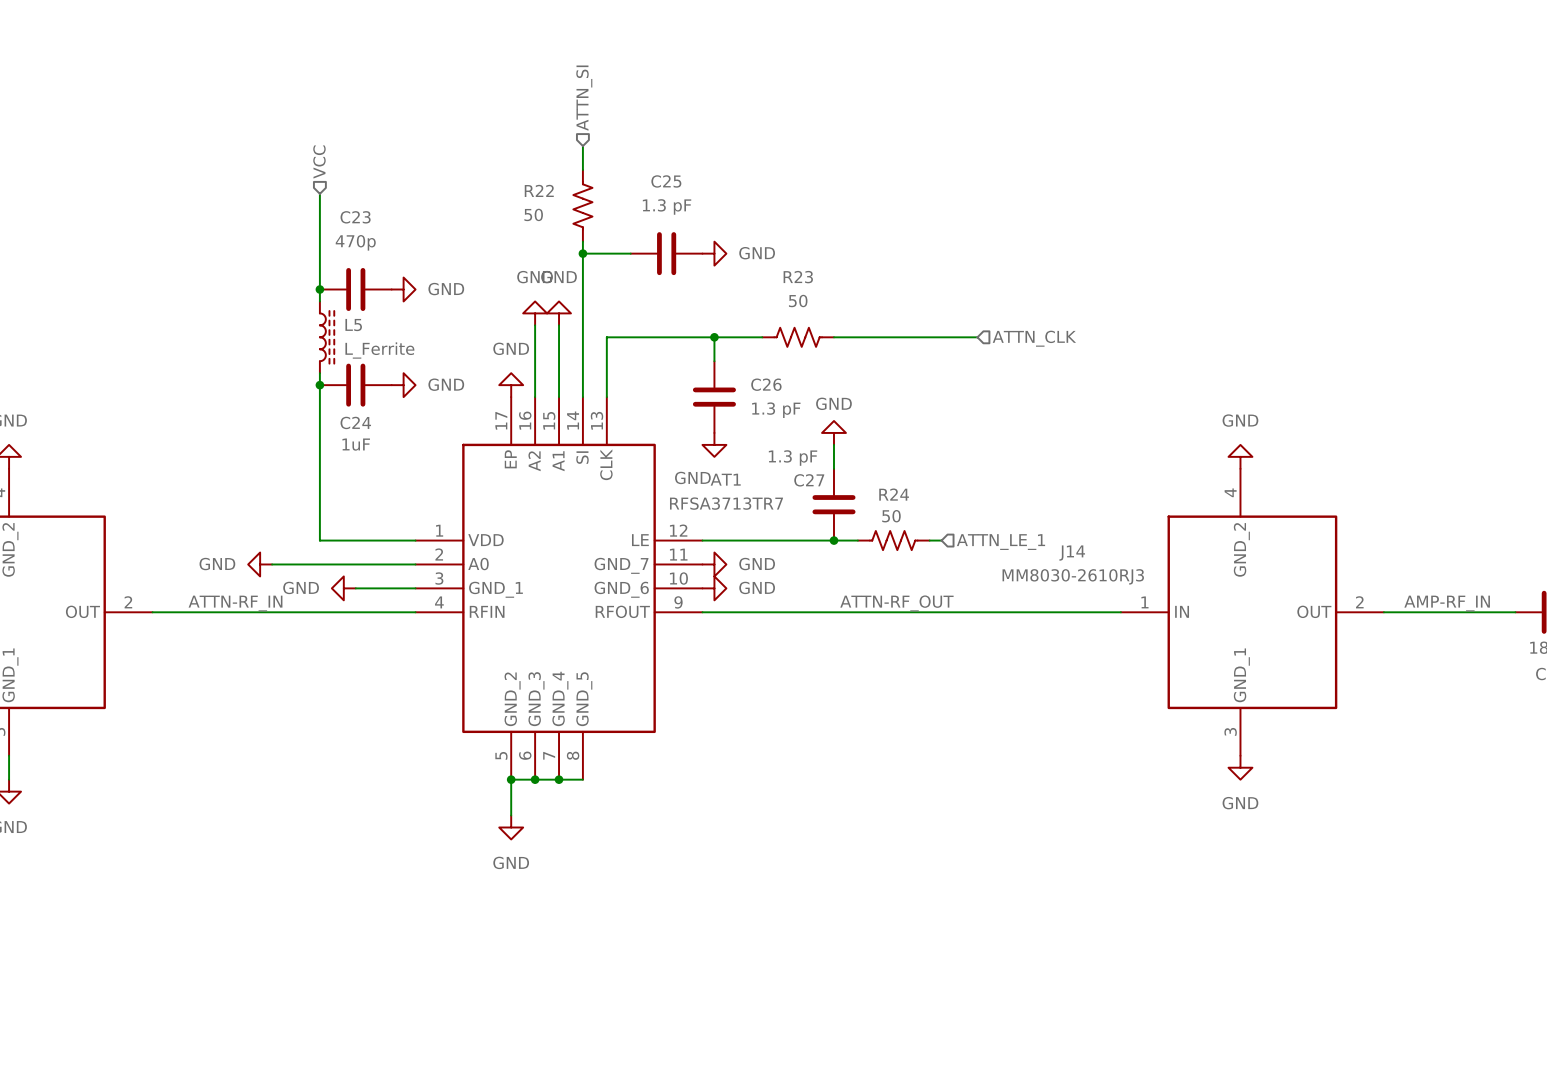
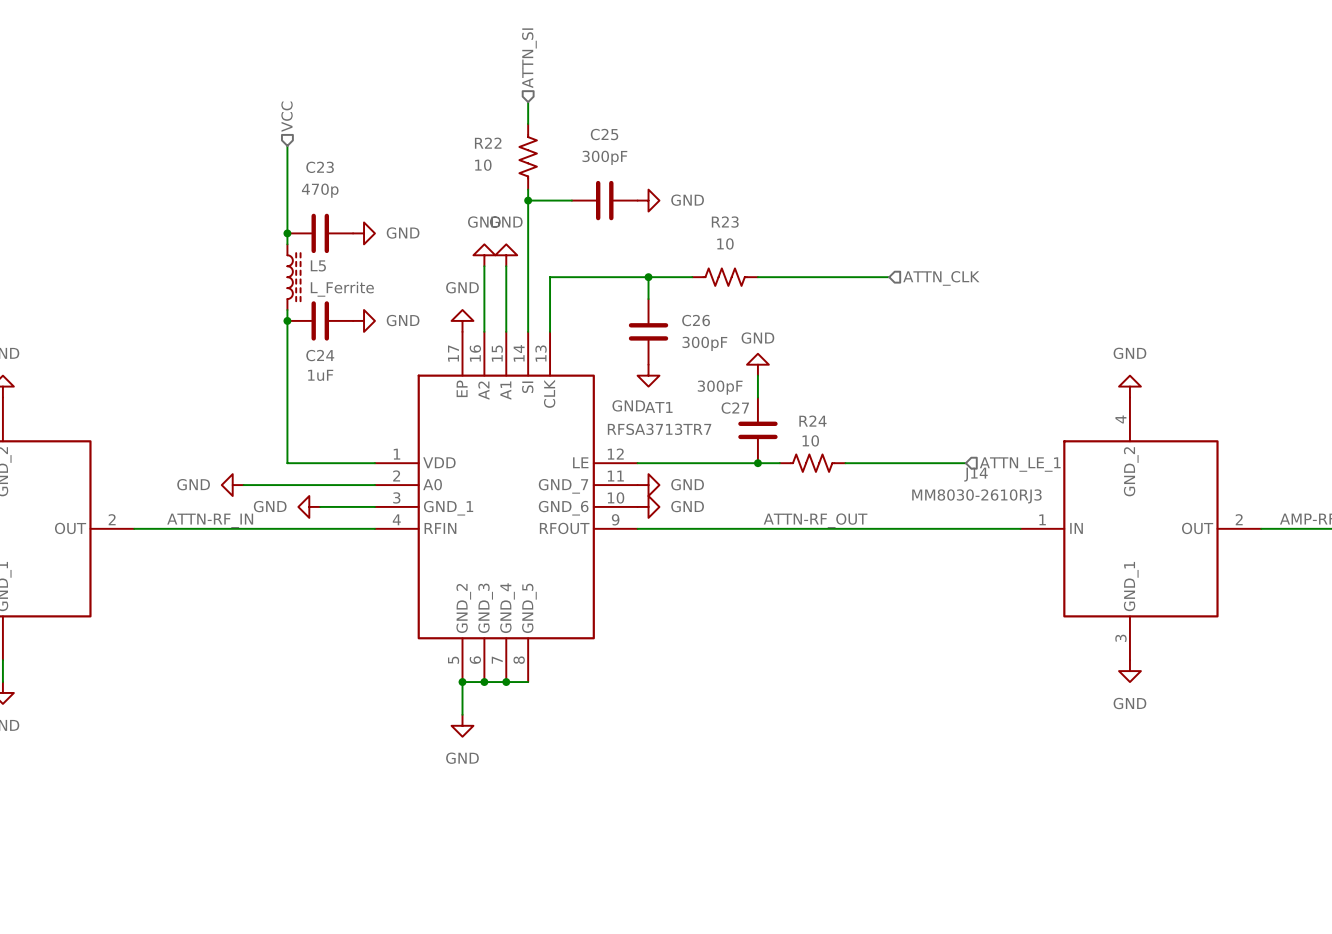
C25 value: 1.3 pF (667, 206) -> 300pF (604, 157)
R22 value: 50 (533, 214) -> 10 (483, 165)
R23 value: 50 (798, 301) -> 10 (725, 243)
C26 value: 1.3 pF (776, 410) -> 300pF (704, 343)
C27 value: 1.3 pF (793, 458) -> 300pF (720, 387)
R24 value: 50 (891, 516) -> 10 (810, 440)
wire: none -> (856, 463) (965, 463)
hierarchical label position: ATTN_LE_1 (1001, 542) -> ATTN_LE_1 (1020, 464)

